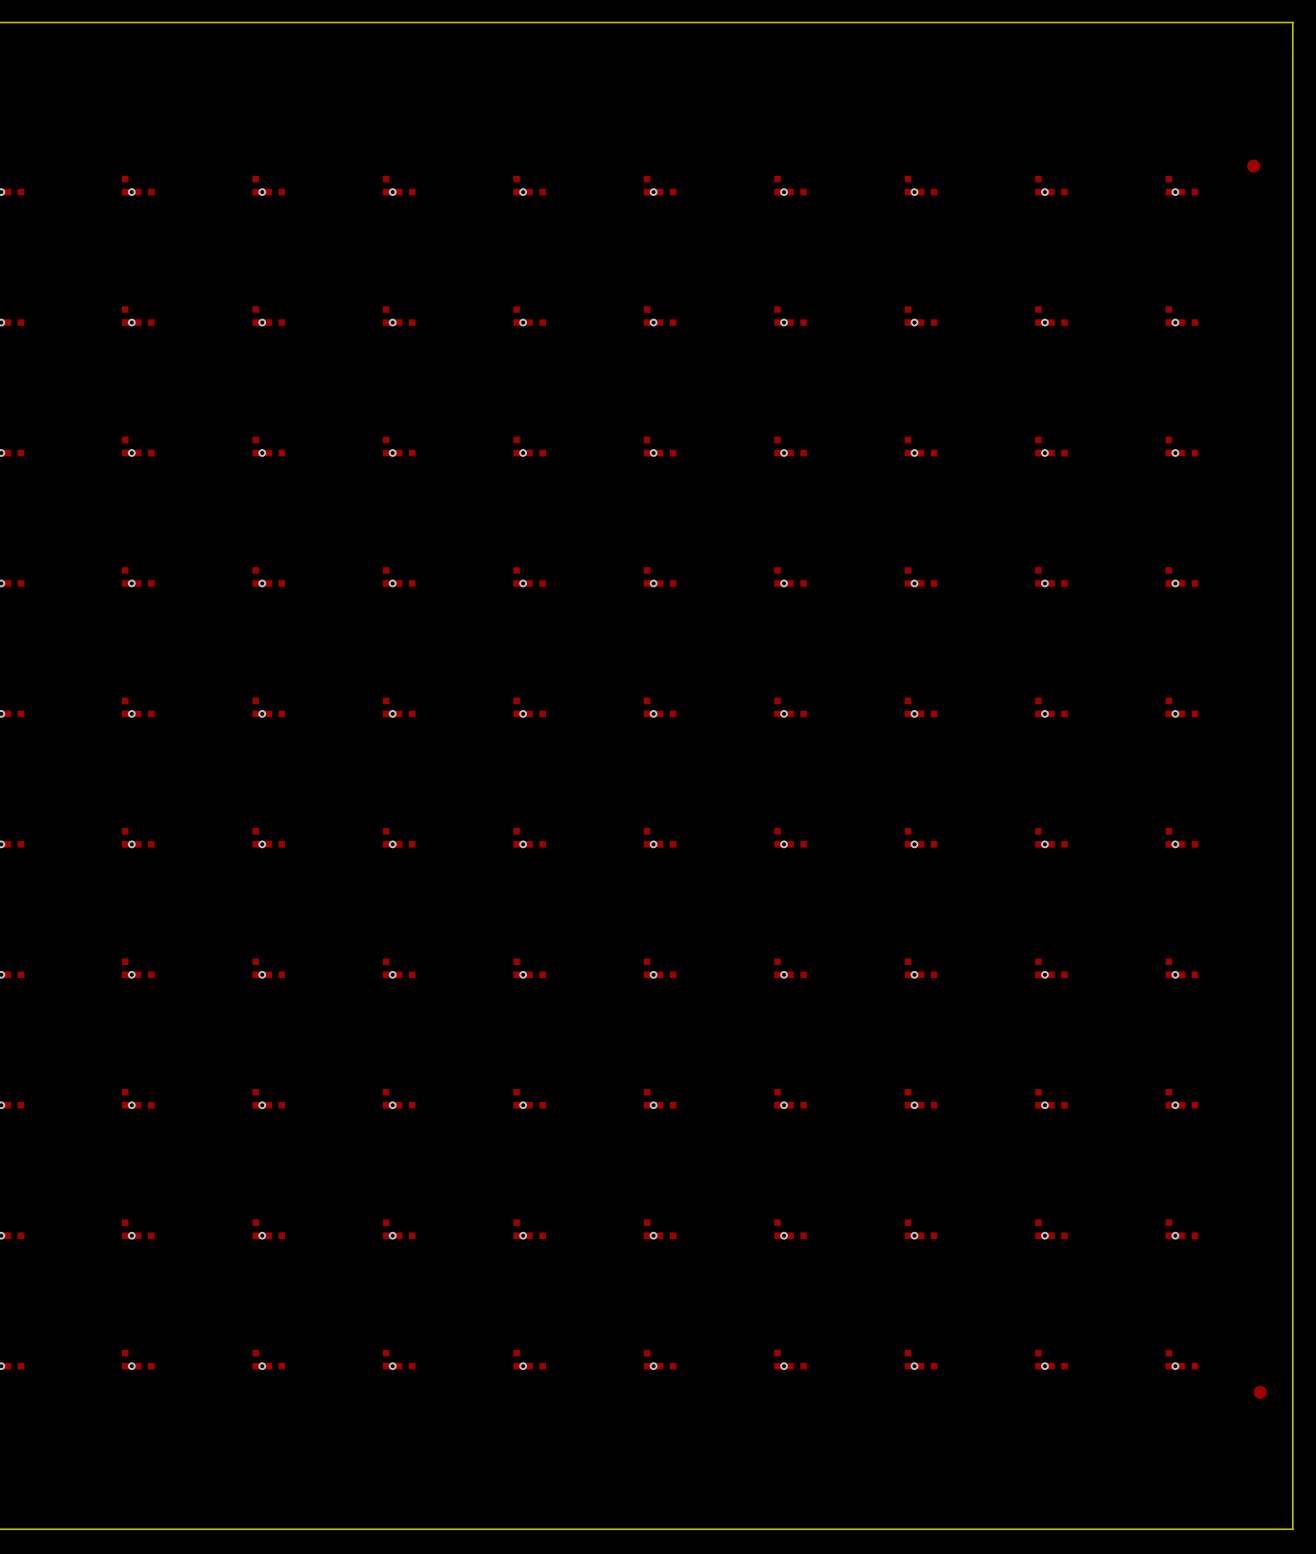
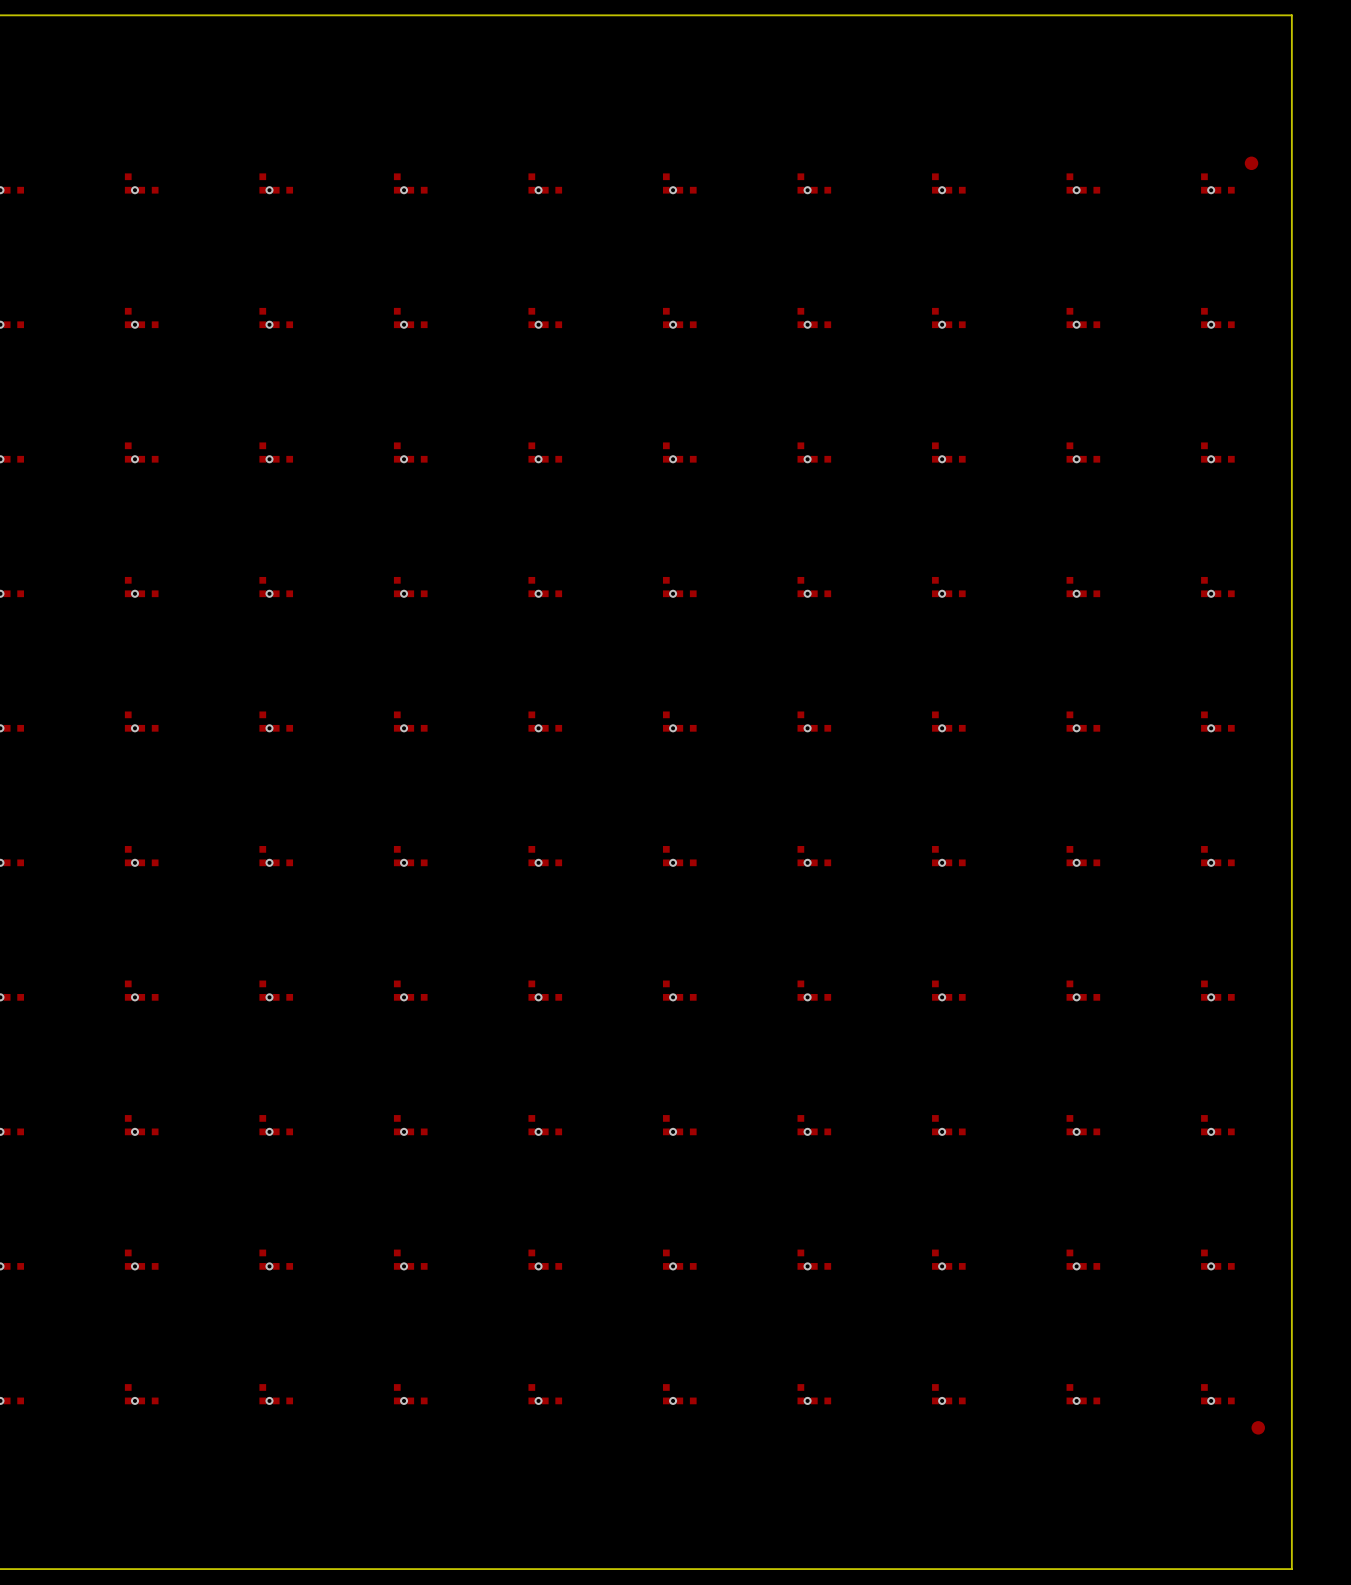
board edge: (1253, 22) (1292, 22) (1292, 1529) (1253, 1529) -> (1291, 15) (1291, 1569)
part position: (1253, 166) -> (1251, 163)
part position: (1260, 1392) -> (1258, 1427)

